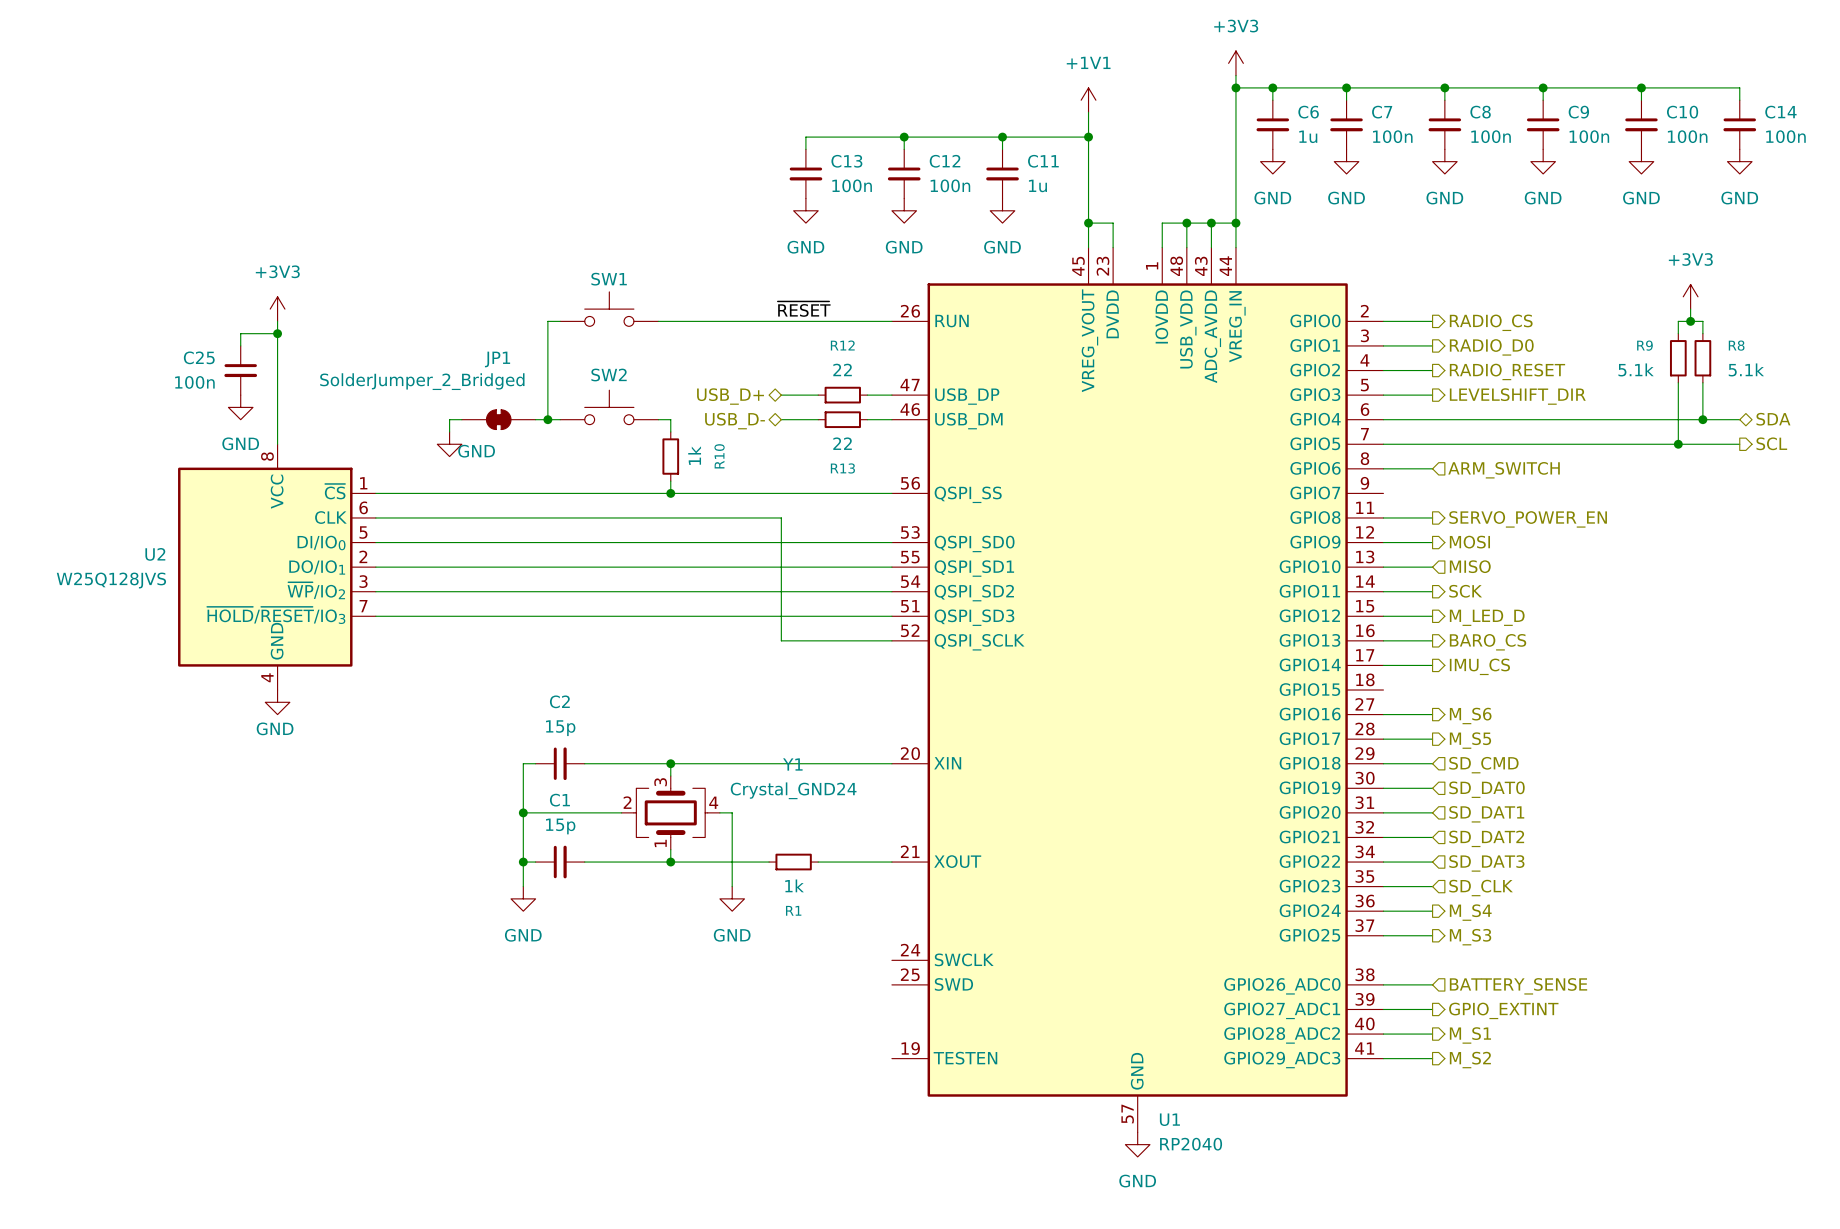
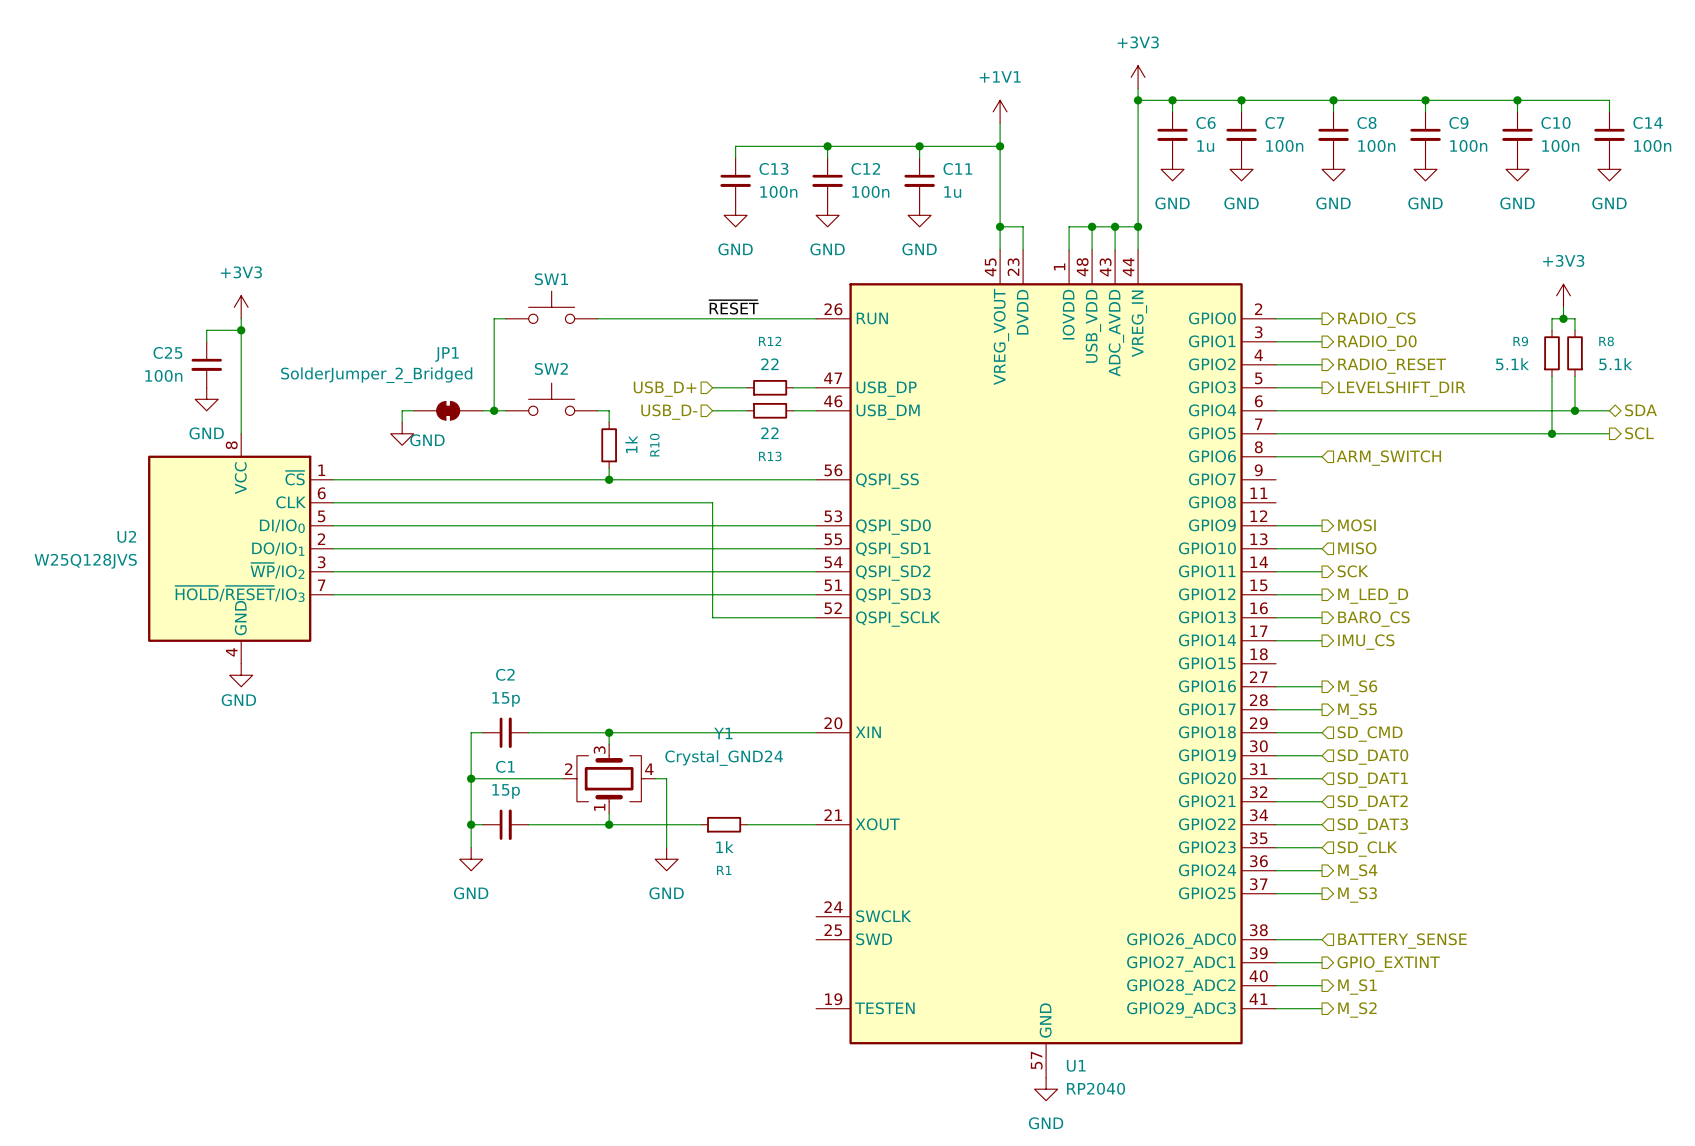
hierarchical label shape: bidirectional (730, 396) -> input (665, 389)
hierarchical label shape: bidirectional (735, 421) -> input (669, 412)
wire: (1383, 517) (1432, 517) -> none
hierarchical label: SERVO_POWER_EN (1528, 519) -> none

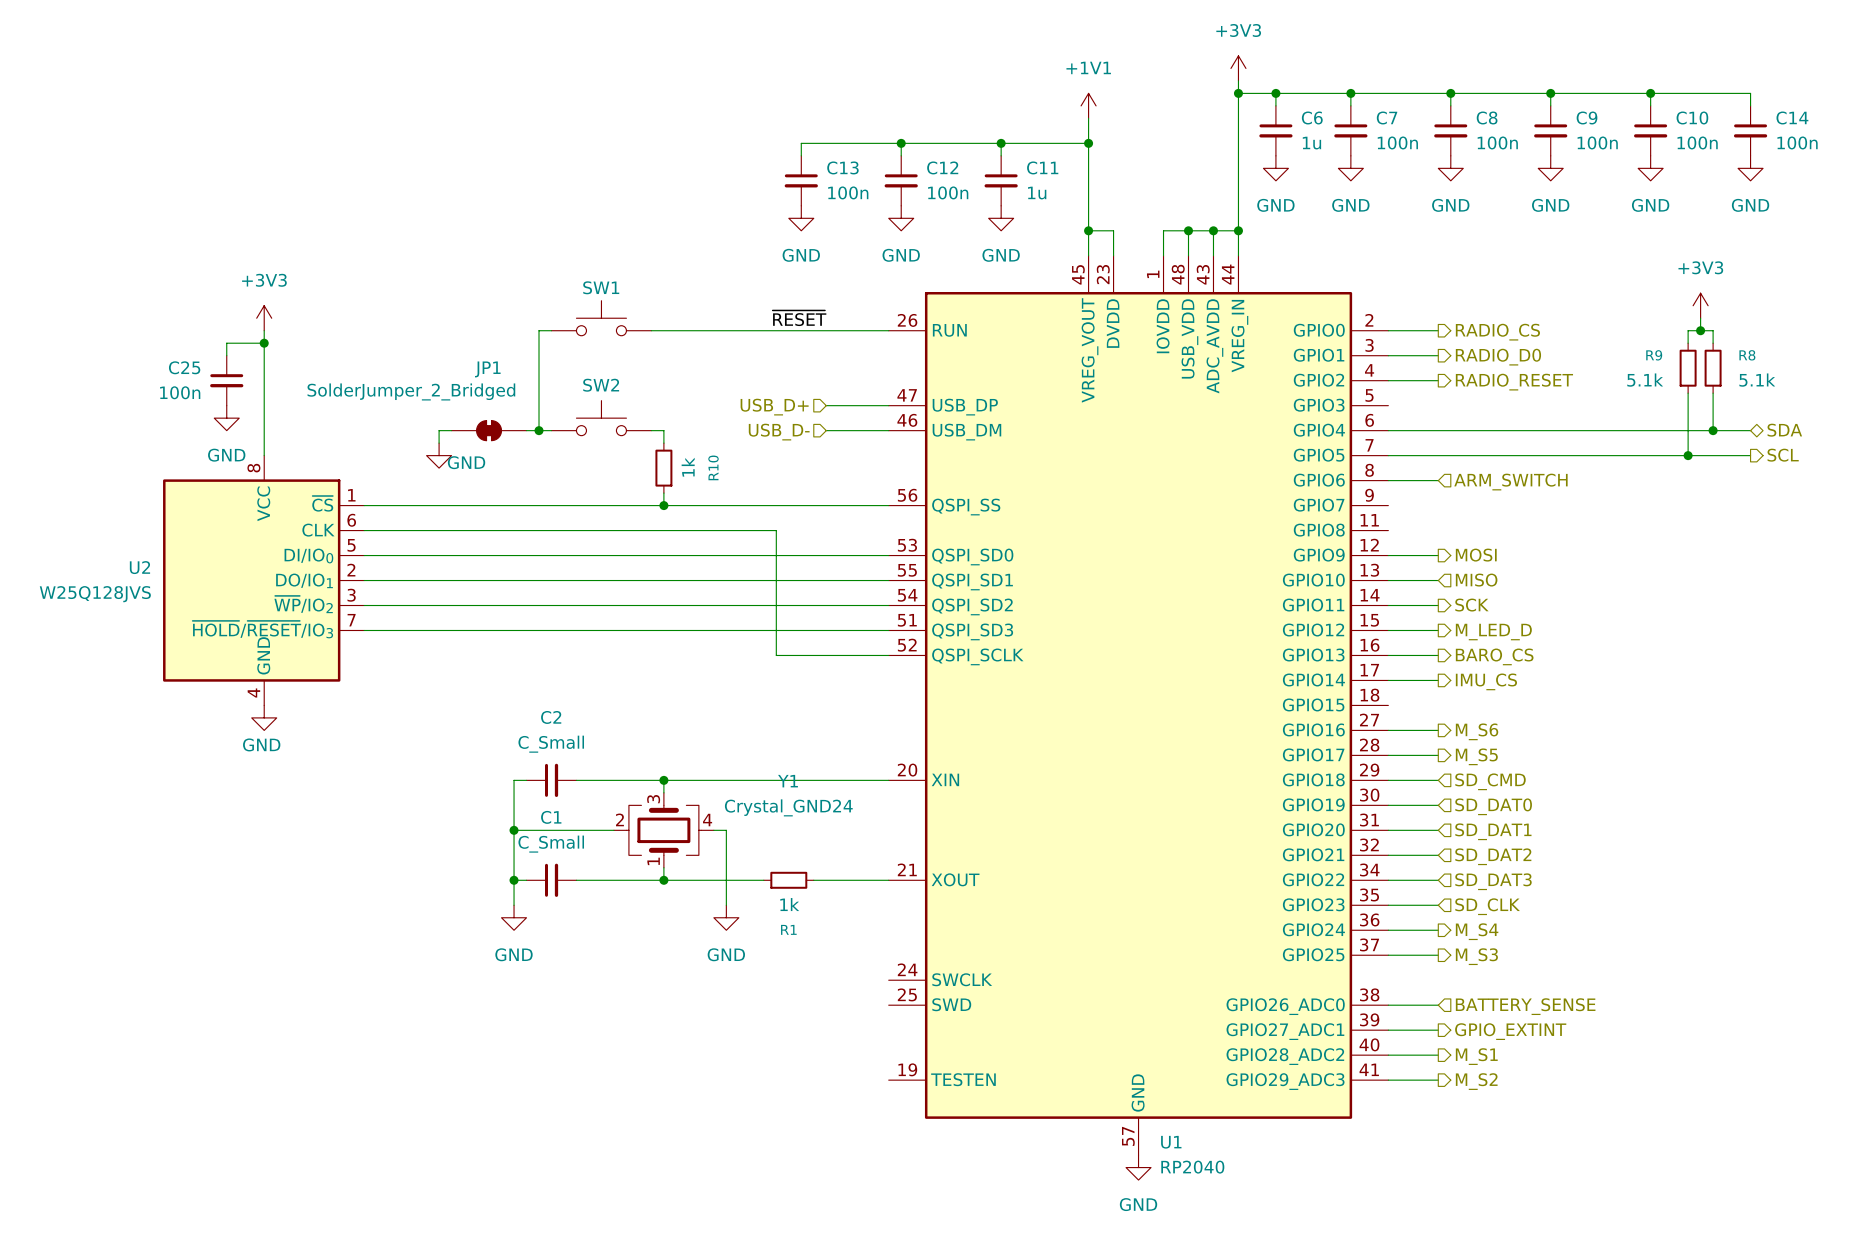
wire: (712, 387) (747, 387) -> (826, 405) (863, 405)
R12: 22 (770, 387) -> none
wire: (1276, 387) (1322, 387) -> none
hierarchical label position: USB_D+ (665, 389) -> USB_D+ (774, 407)
hierarchical label: LEVELSHIFT_DIR (1401, 389) -> none
wire: (712, 410) (747, 410) -> (826, 430) (863, 430)
R13: 22 (770, 410) -> none
hierarchical label position: USB_D- (669, 412) -> USB_D- (779, 432)
C2 value: 15p (506, 699) -> C_Small (551, 744)
C1 value: 15p (506, 791) -> C_Small (551, 844)

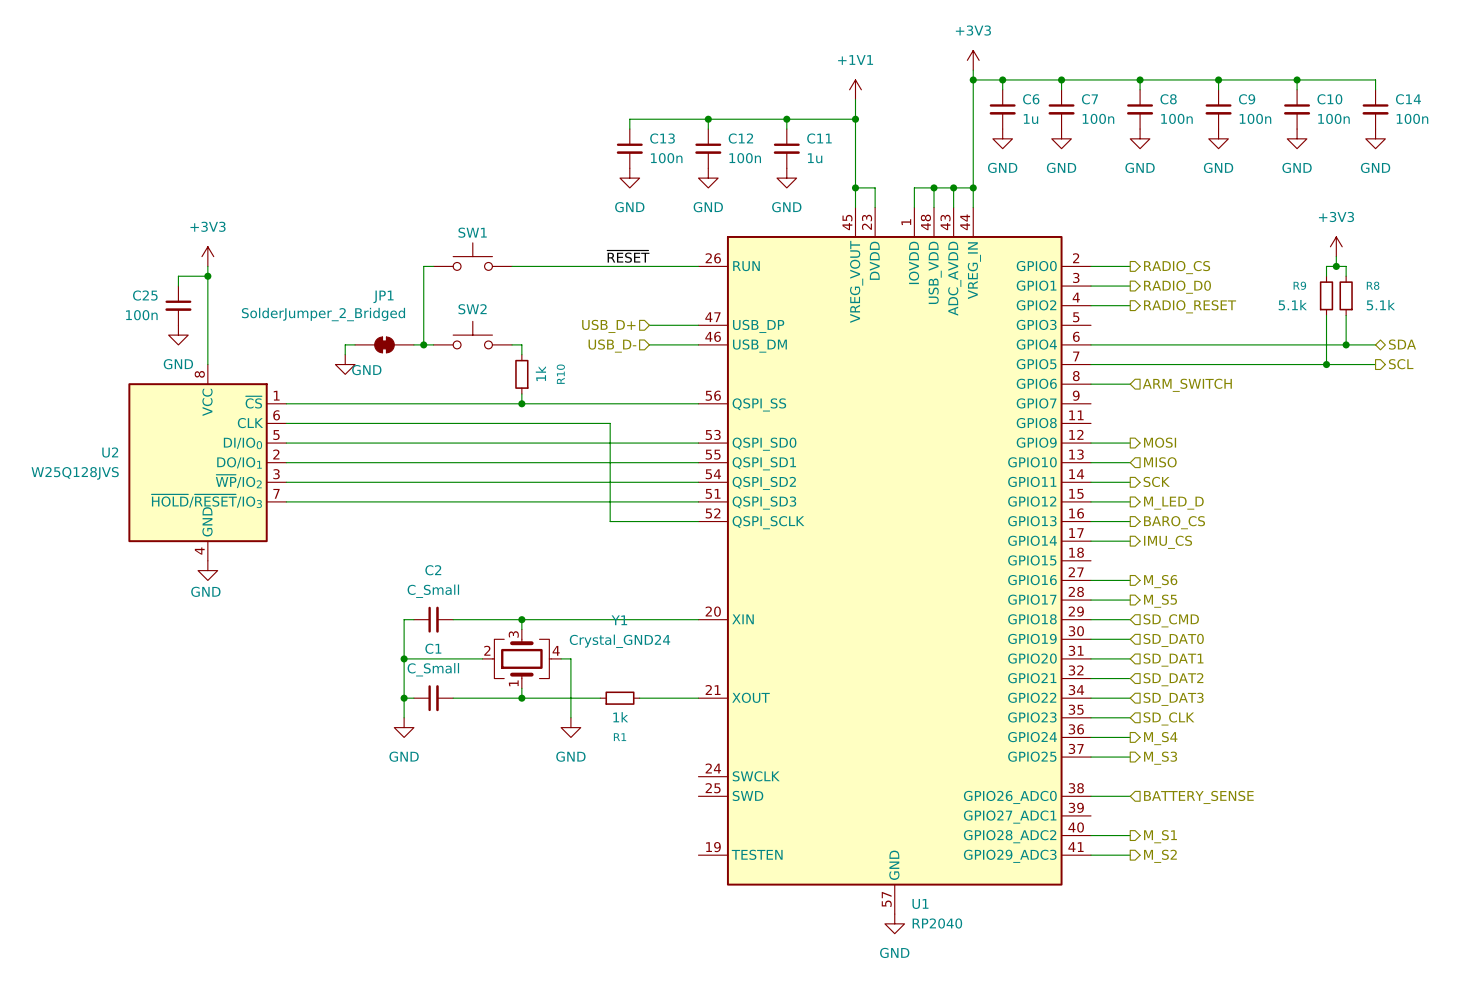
wire: (1388, 1030) (1438, 1030) -> none
hierarchical label: GPIO_EXTINT (1510, 1031) -> none

